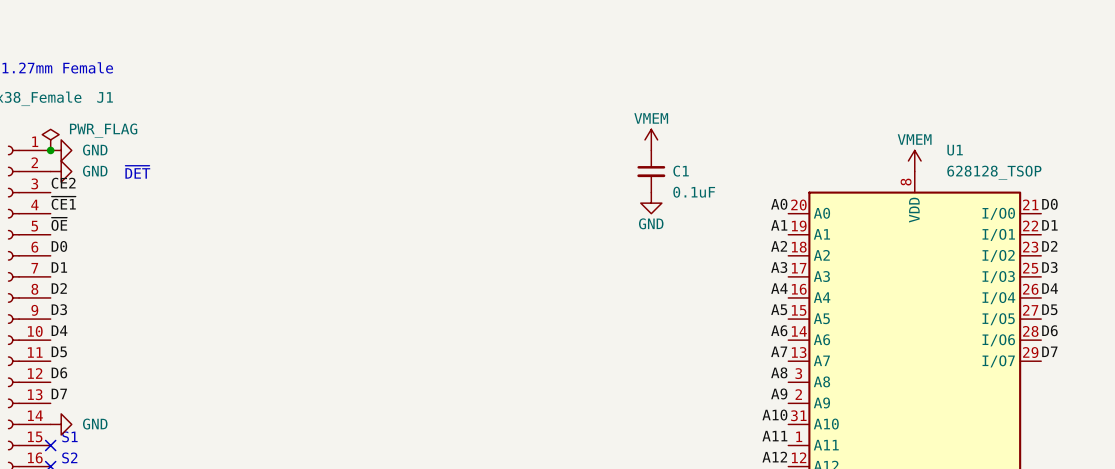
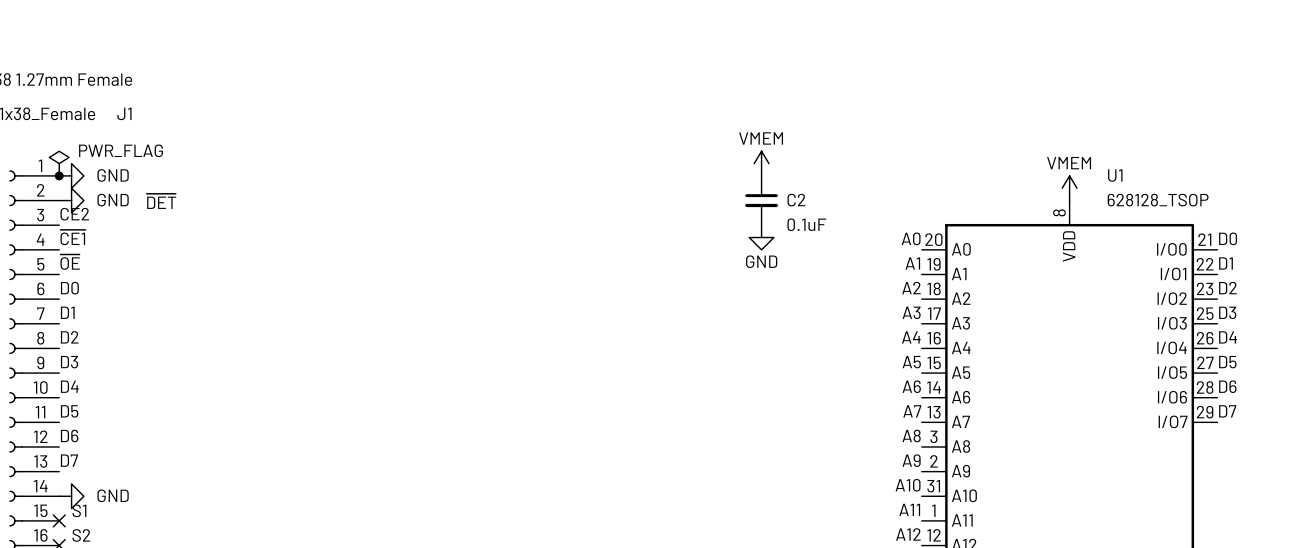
C1 name: C1 (681, 171) -> C2 (796, 200)

